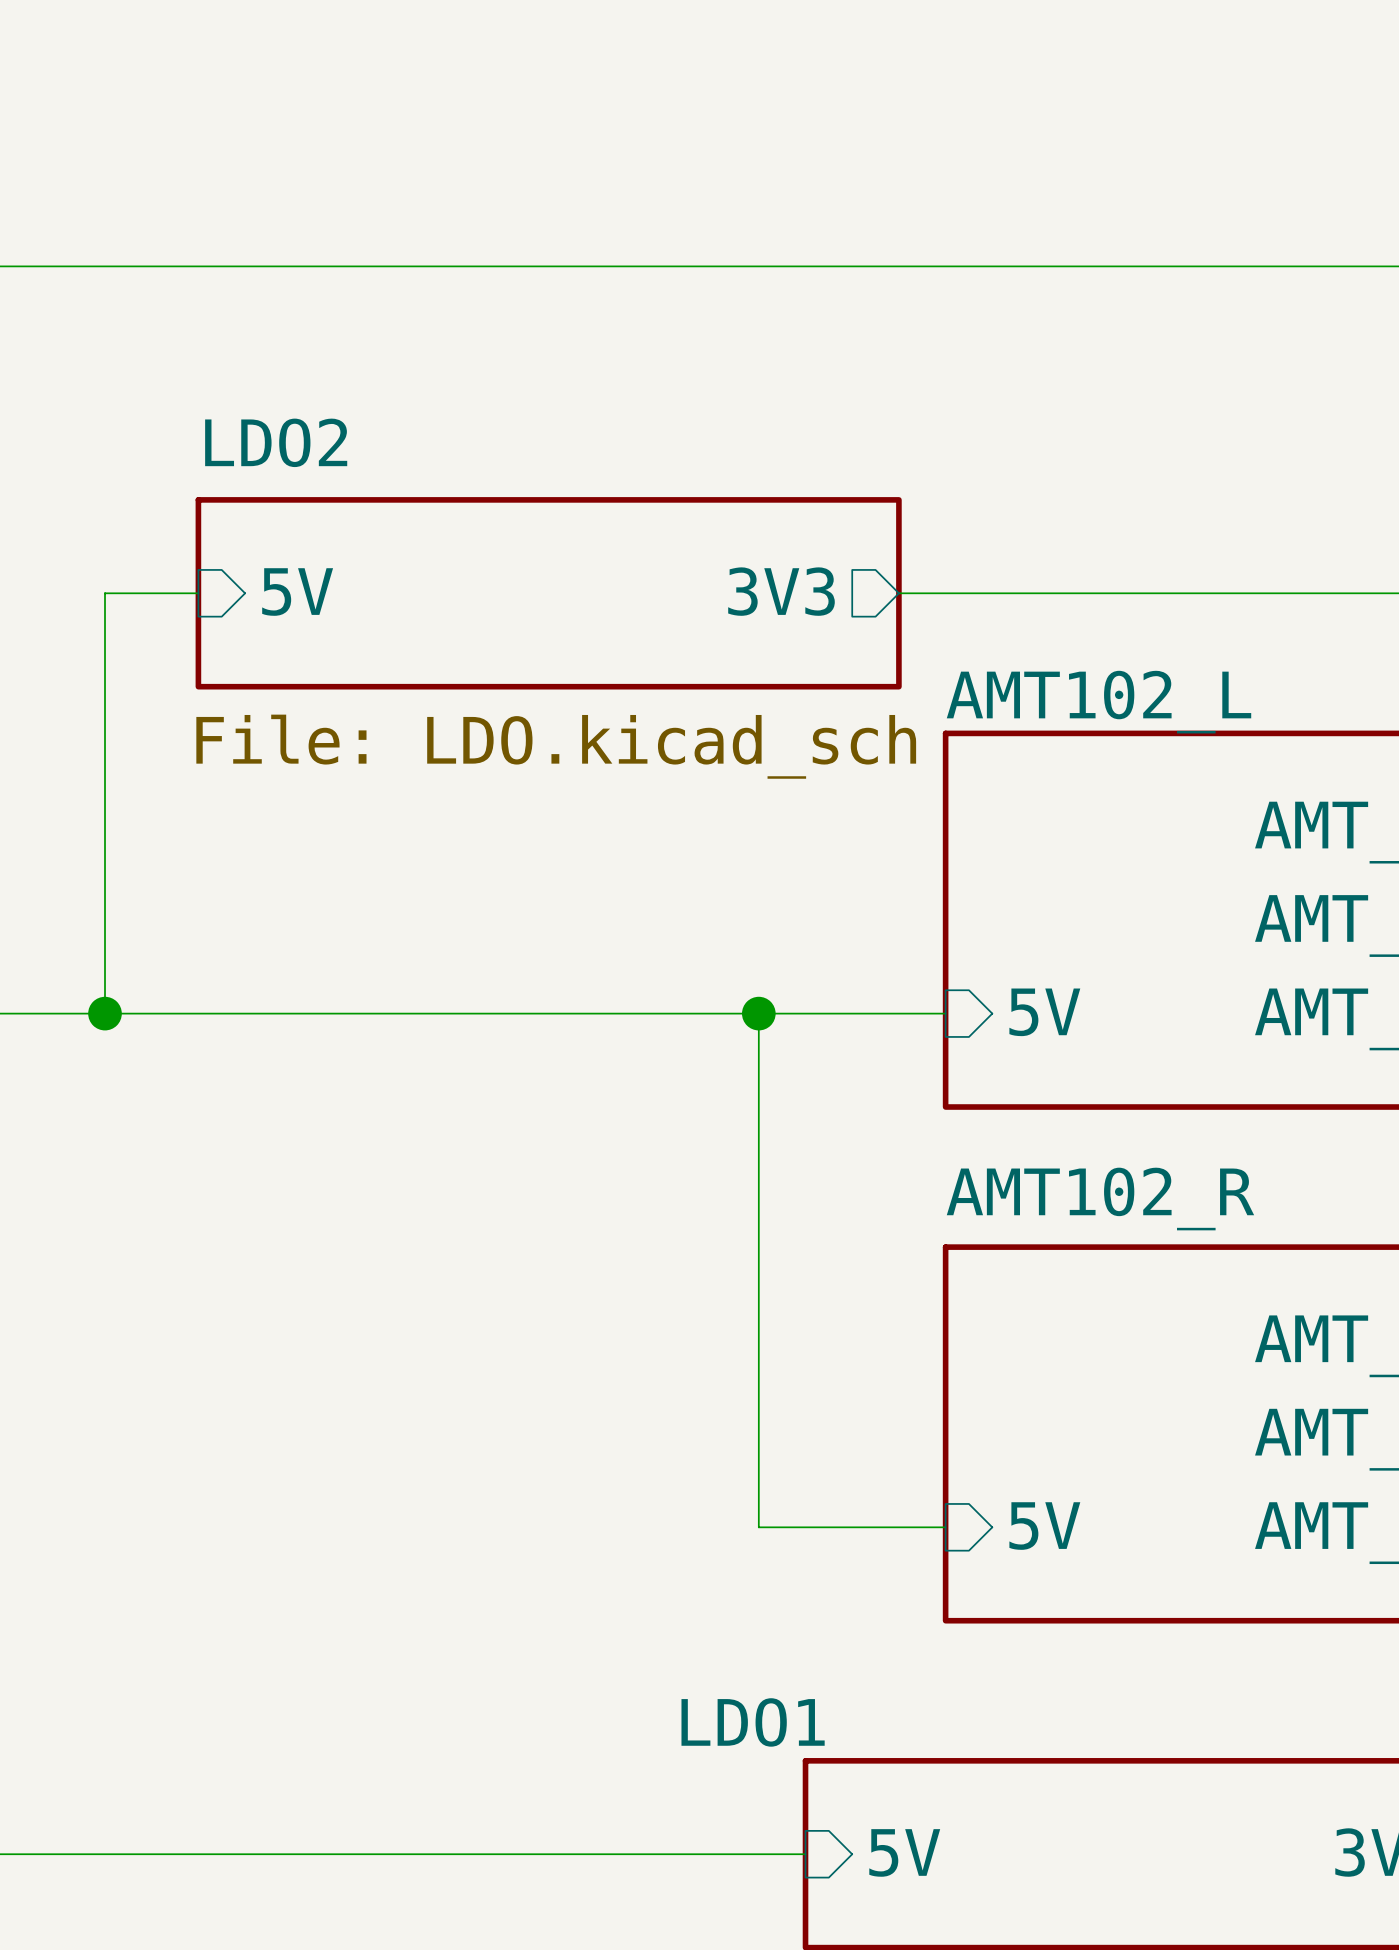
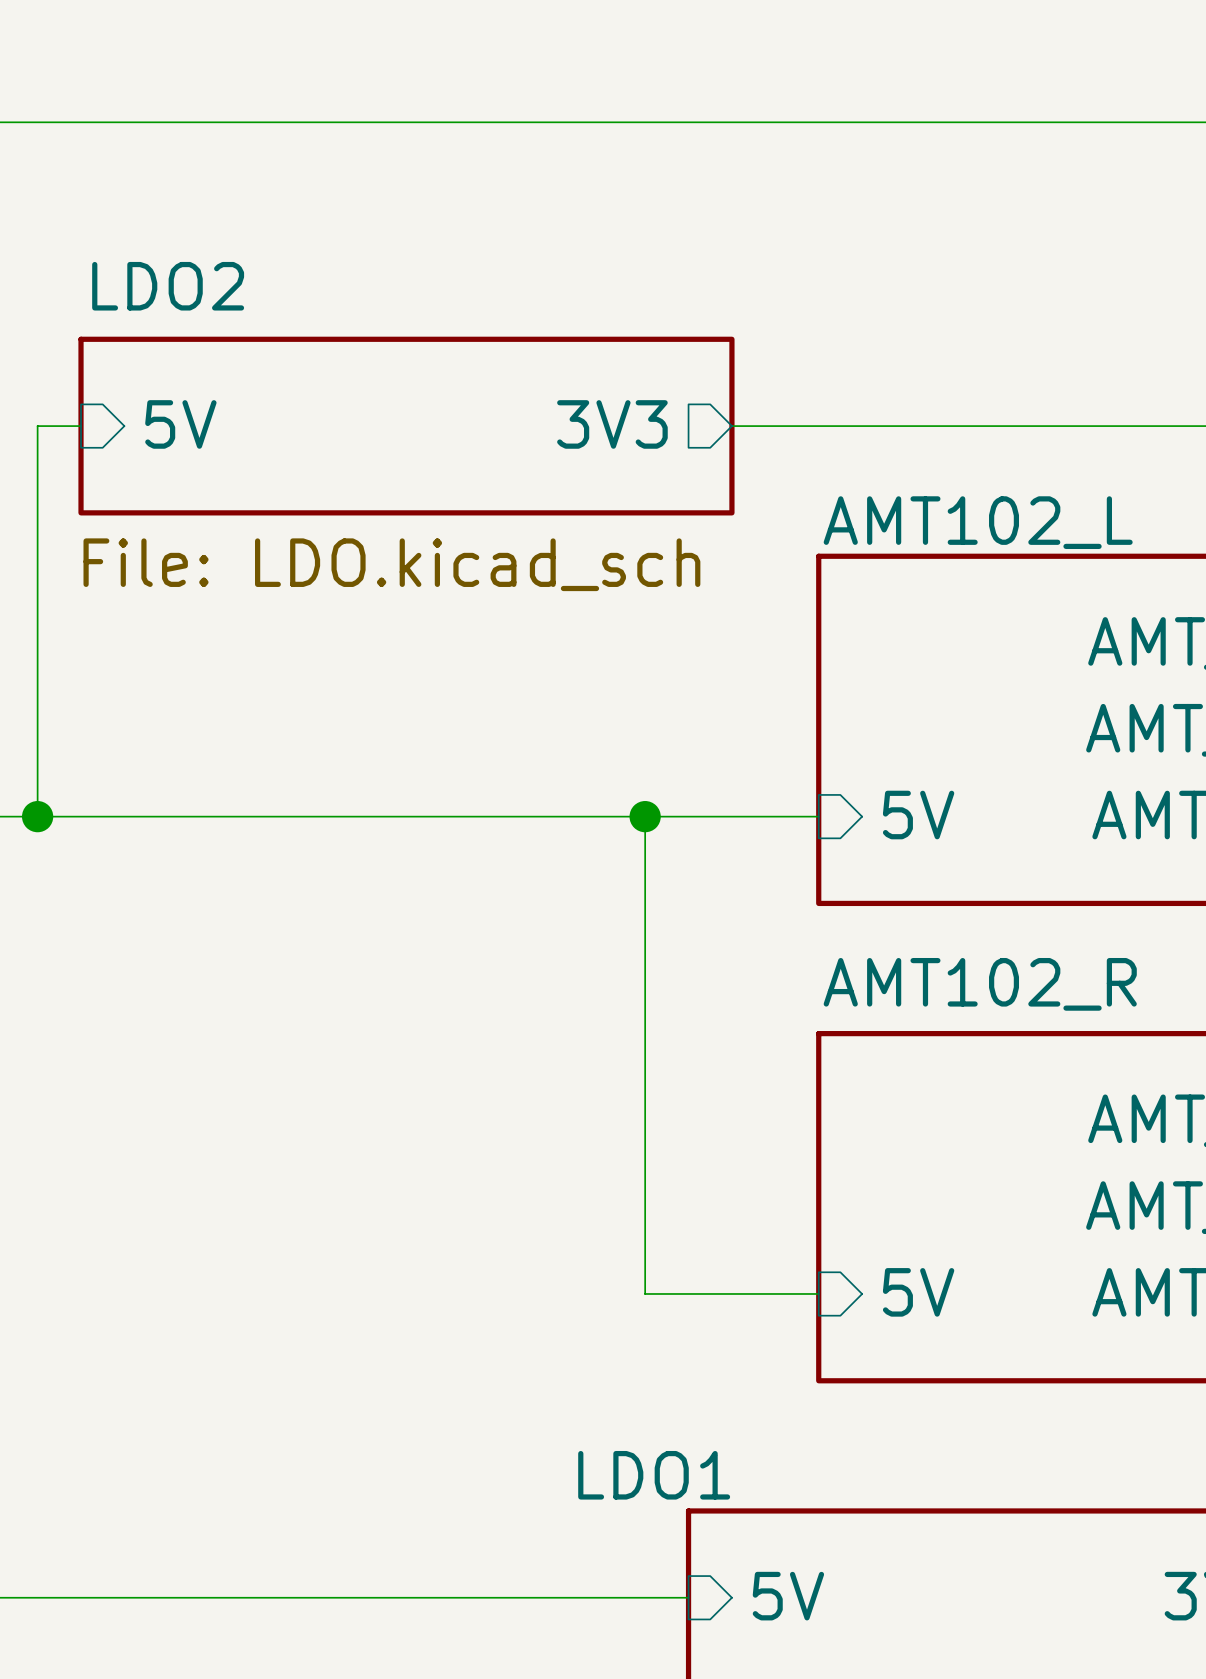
sheet pin position: 3V3 (781, 591) -> 3V3 (612, 424)
sheet pin position: 5V (297, 592) -> 5V (180, 424)
wire: (151, 593) (198, 593) -> (731, 426) (775, 426)
sheet LDO2 position: (548, 593) -> (406, 426)

